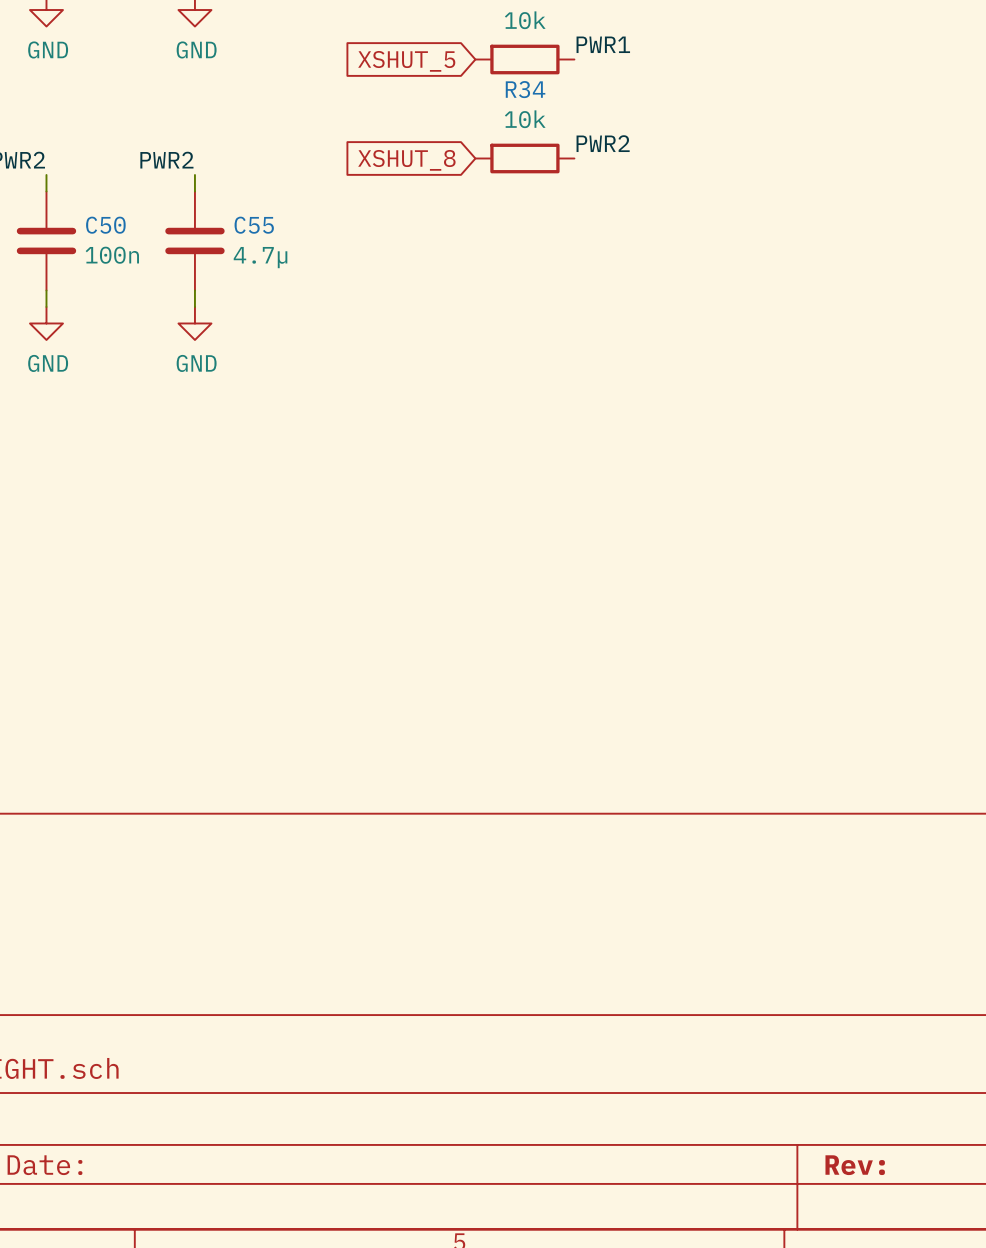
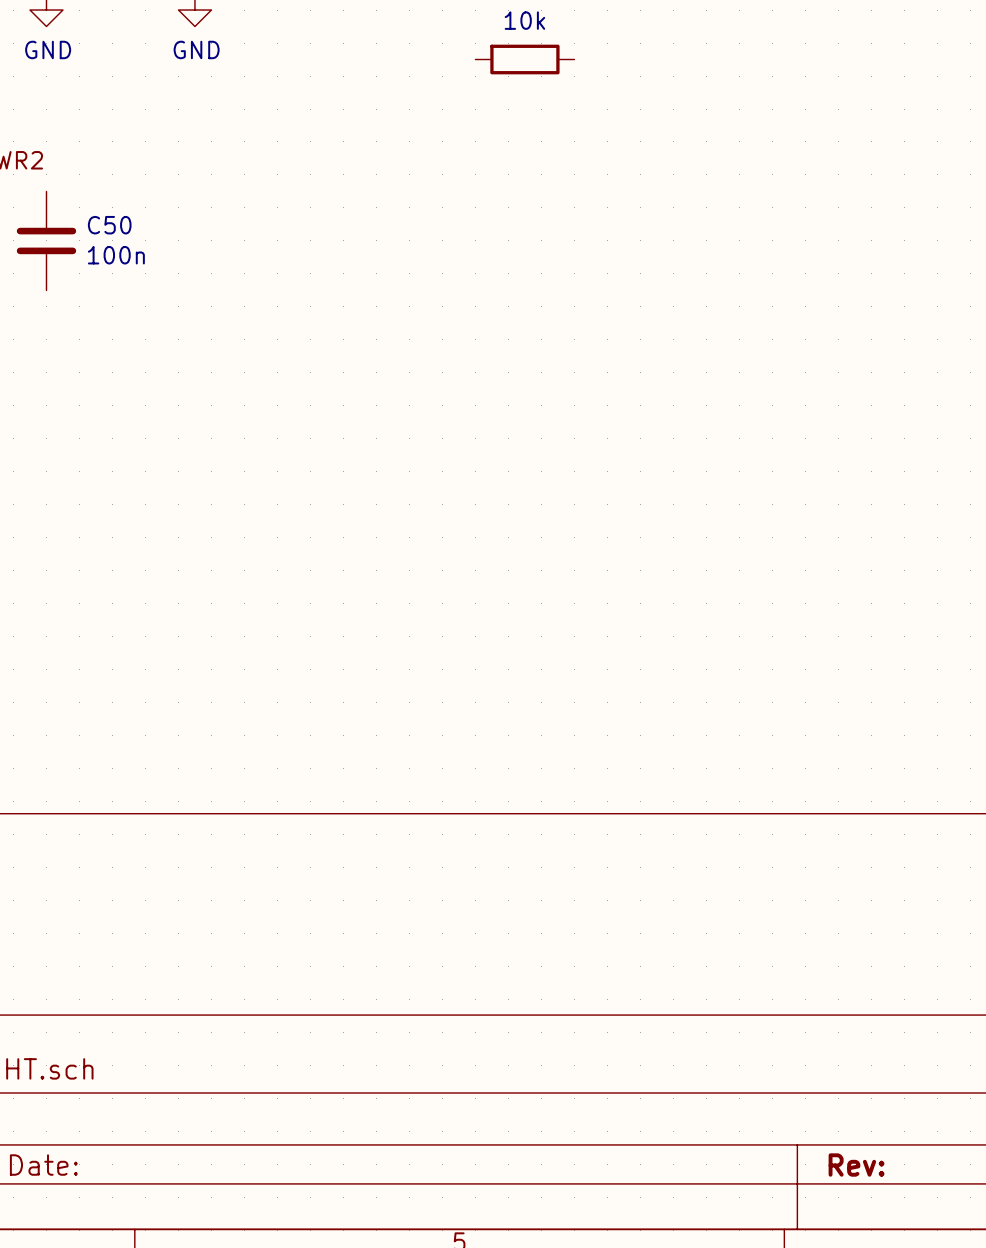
label: PWR1 (603, 44) -> none
global label: XSHUT_5 (406, 61) -> none
label: PWR2 (603, 143) -> none
R34: 10k (524, 158) -> none
label: PWR2 (166, 160) -> none
global label: XSHUT_8 (406, 160) -> none
wire: (46, 174) (46, 191) -> none
wire: (194, 174) (194, 191) -> none
C55: 4.7µ (194, 240) -> none
wire: (46, 290) (46, 306) -> none
wire: (194, 290) (194, 306) -> none
power symbol: GND (46, 323) -> none
power symbol: GND (194, 323) -> none

